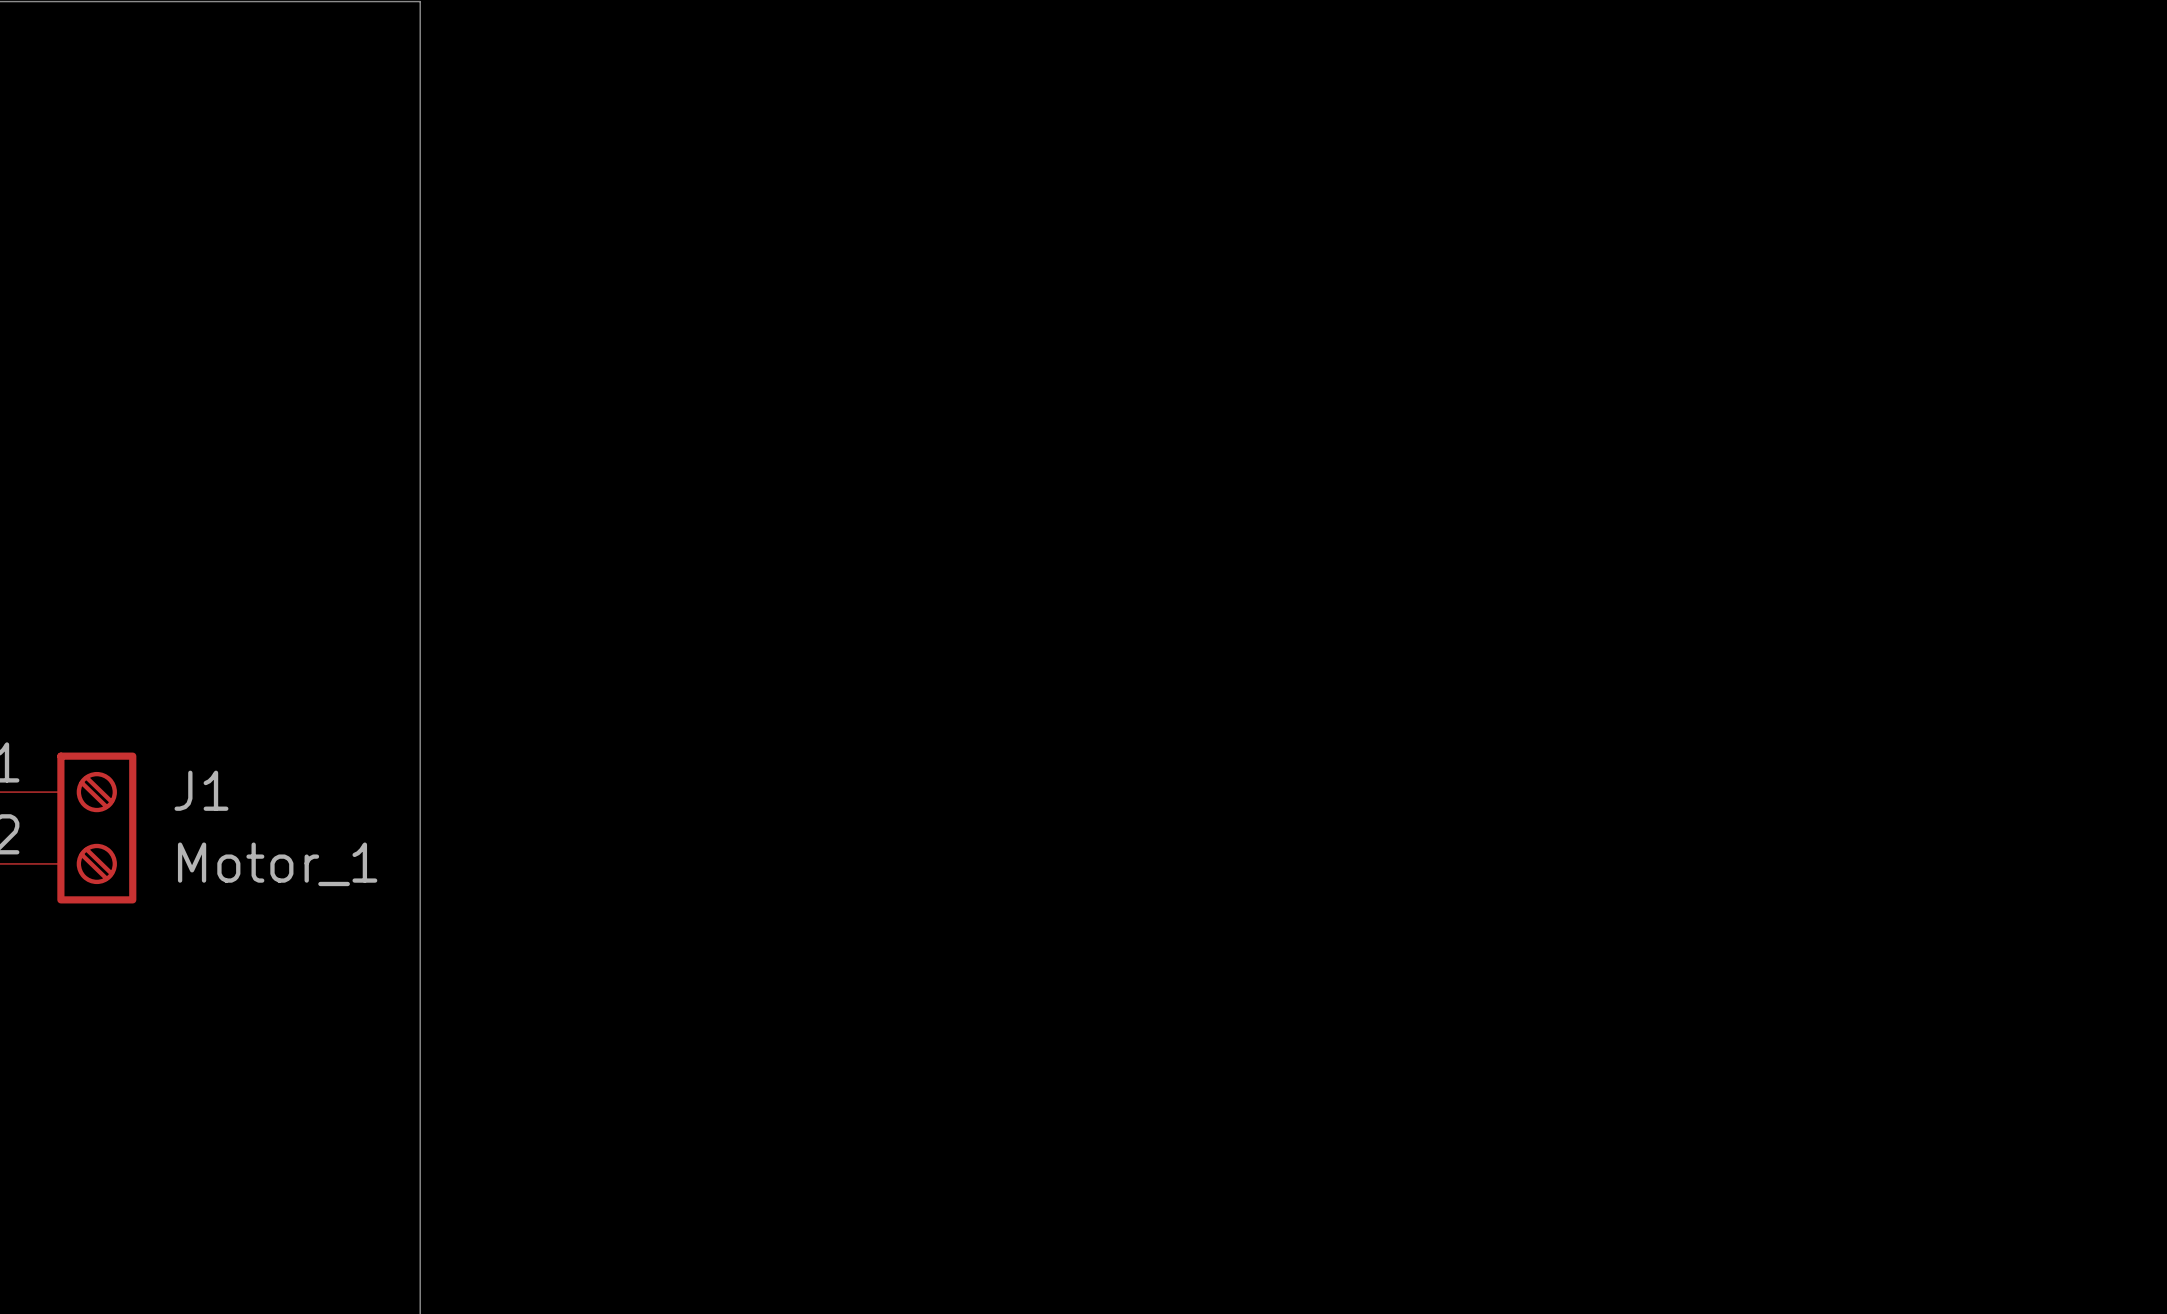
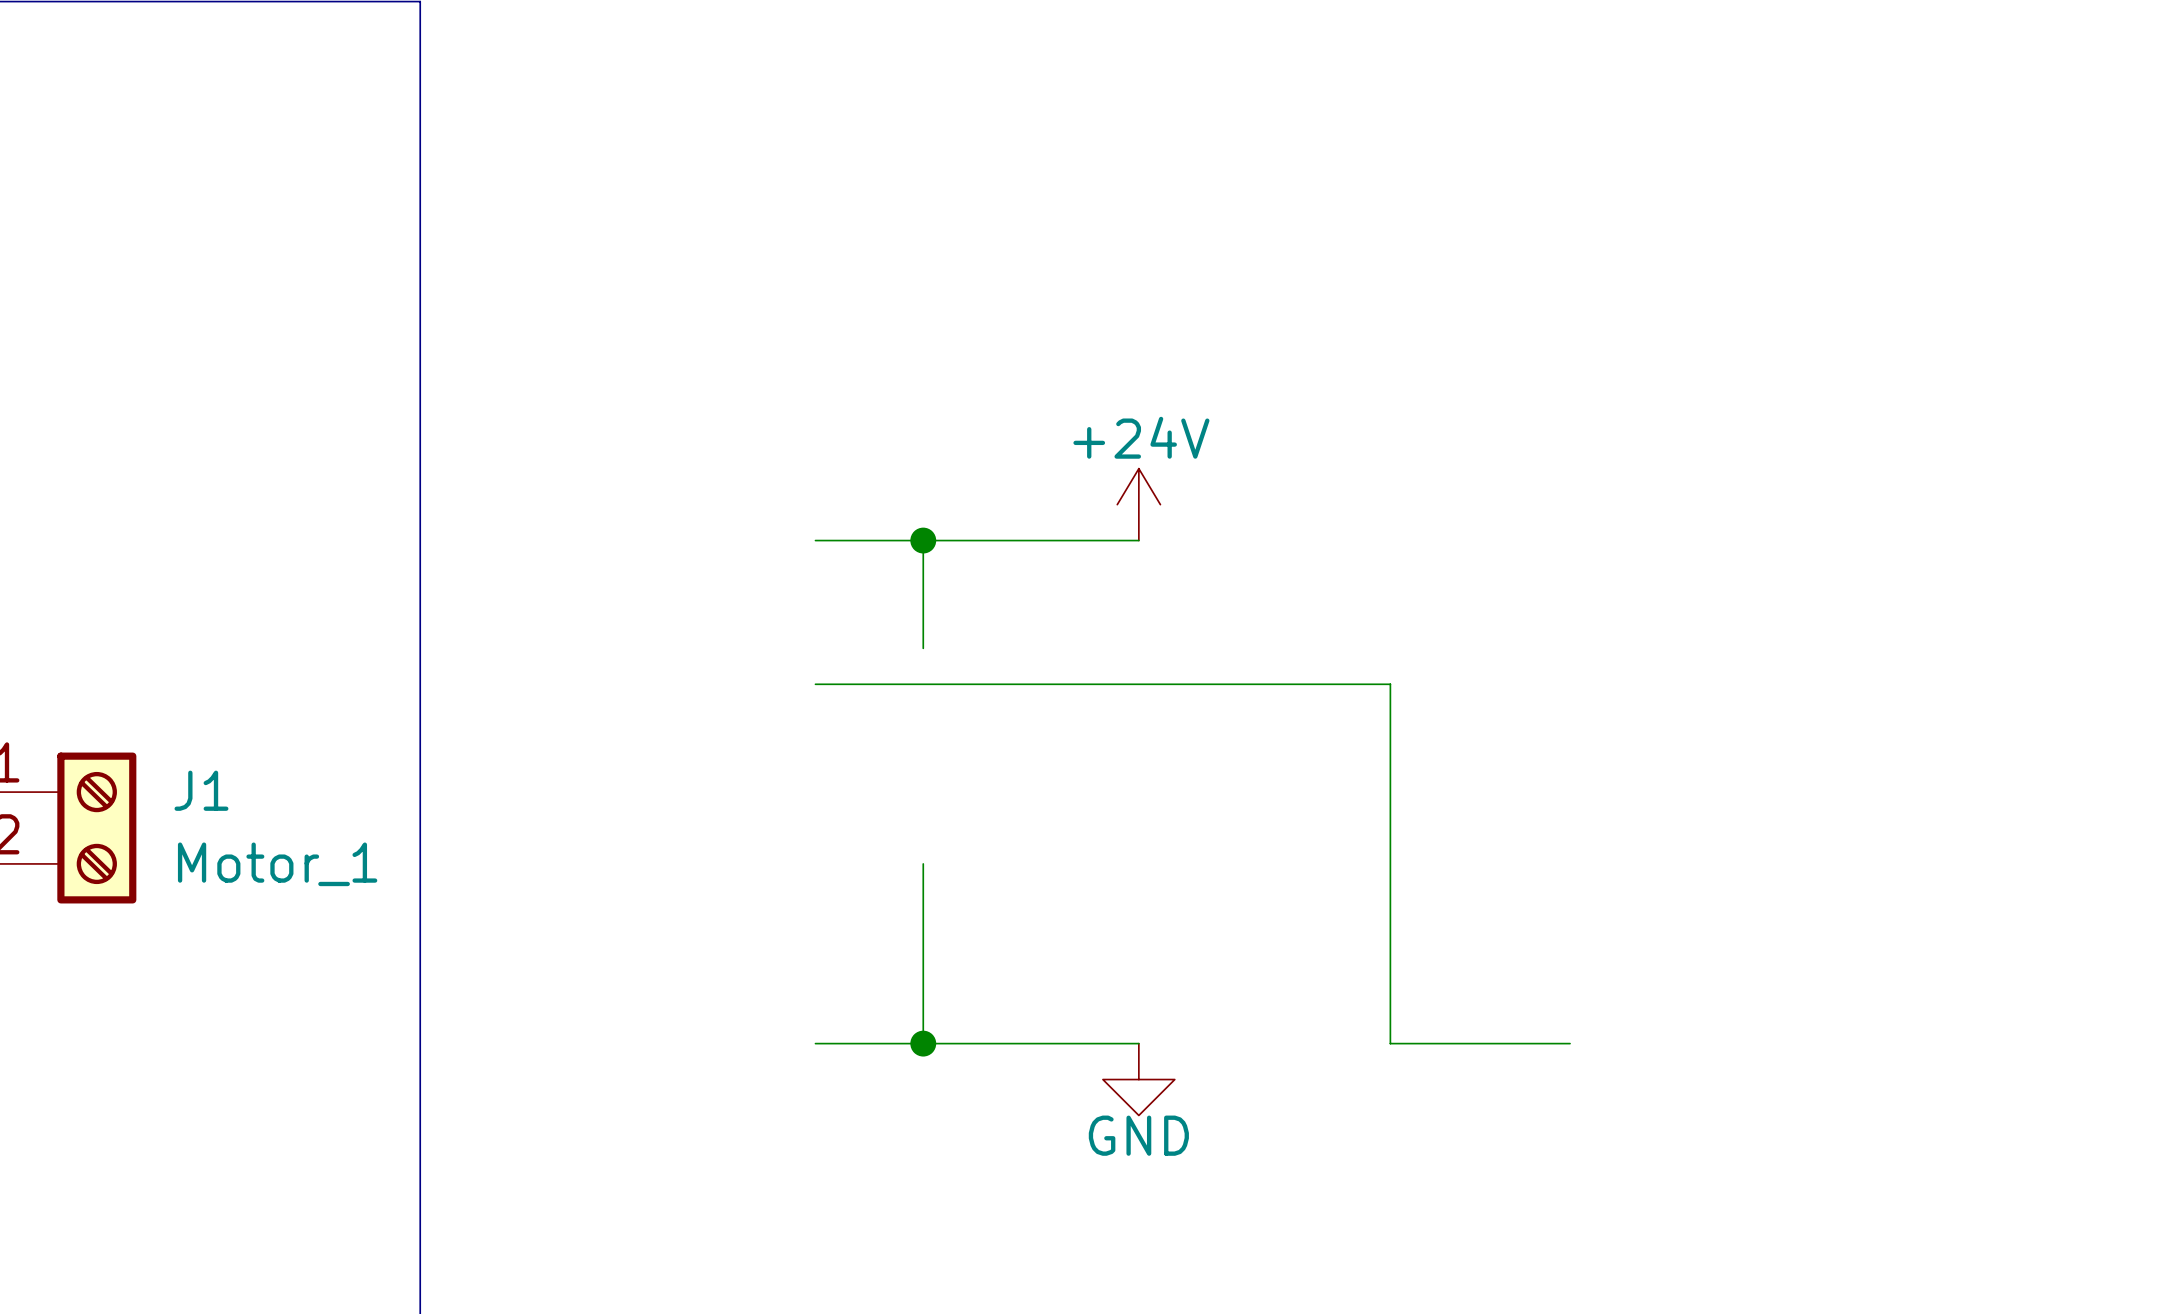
power symbol: none -> +24V (1138, 504)
wire: none -> (815, 540) (1138, 540)
wire: none -> (923, 540) (923, 648)
junction: none -> (923, 540)
wire: none -> (815, 684) (1390, 684) (1390, 1043) (1570, 1043)
wire: none -> (923, 863) (923, 1043)
wire: none -> (815, 1043) (1138, 1043)
junction: none -> (923, 1043)
power symbol: none -> GND (1138, 1079)

